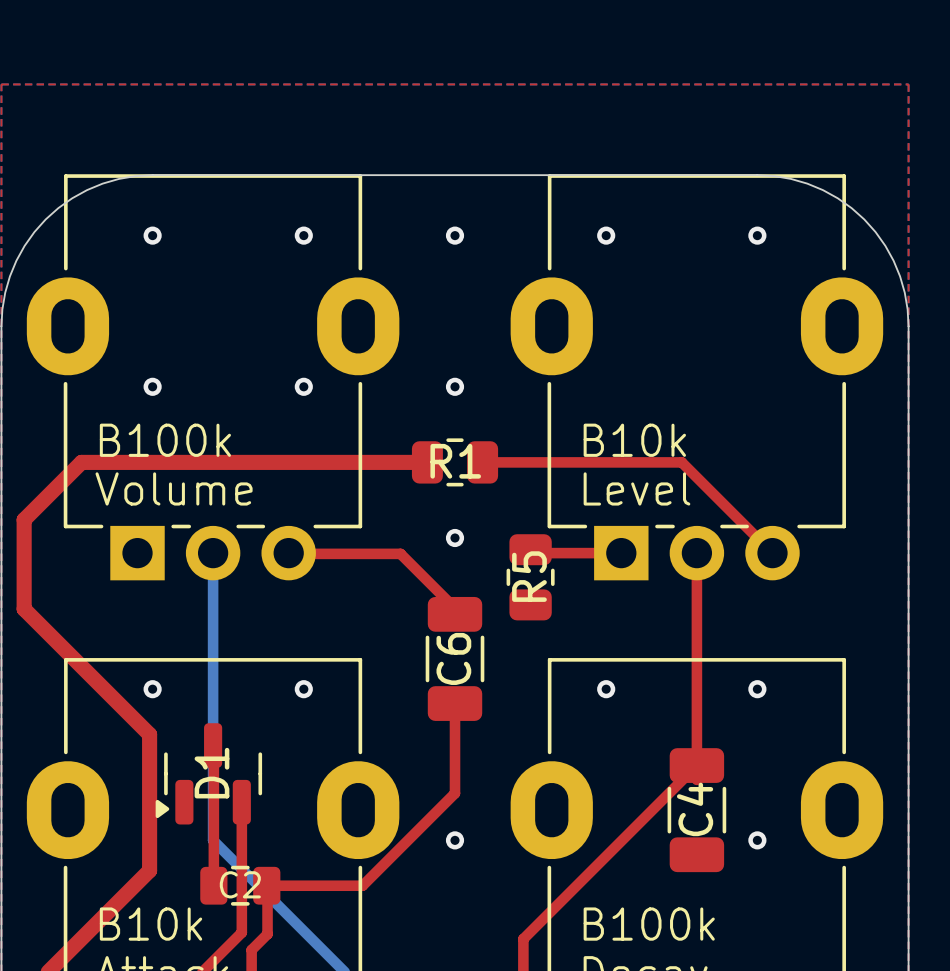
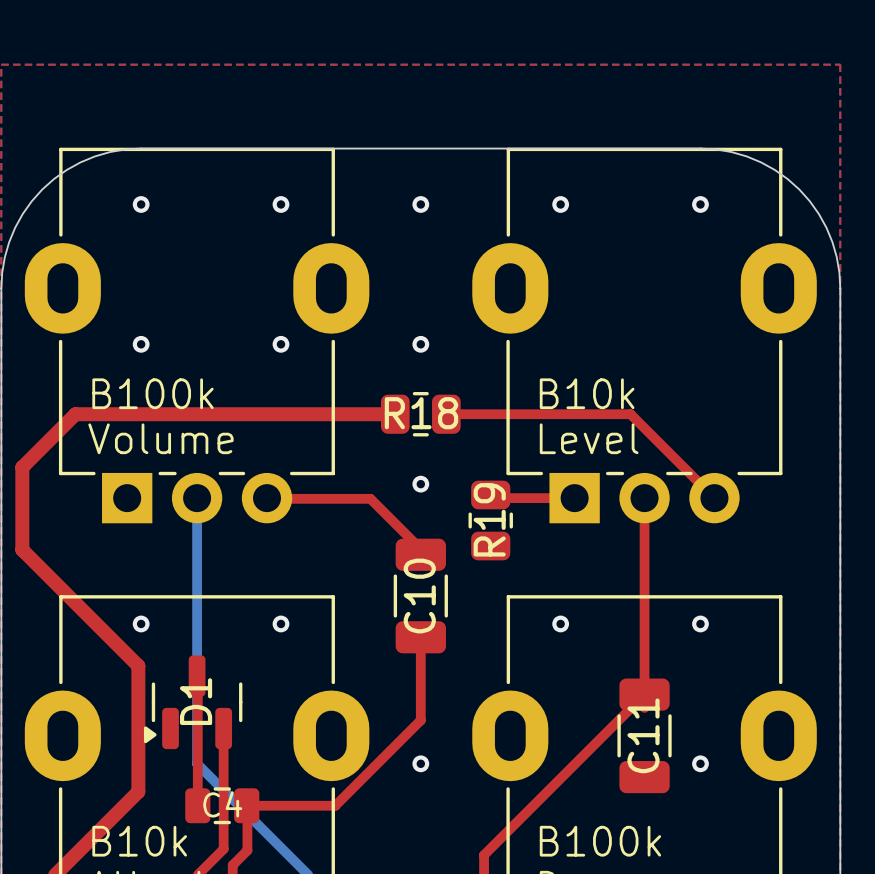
R1 name: R1 (455, 461) -> R18 (421, 413)
R5 name: R5 (529, 576) -> R19 (489, 519)
C6 name: C6 (453, 658) -> C10 (419, 596)
C4 name: C4 (695, 809) -> C11 (643, 735)
C2 name: C2 (240, 884) -> C4 (222, 804)

